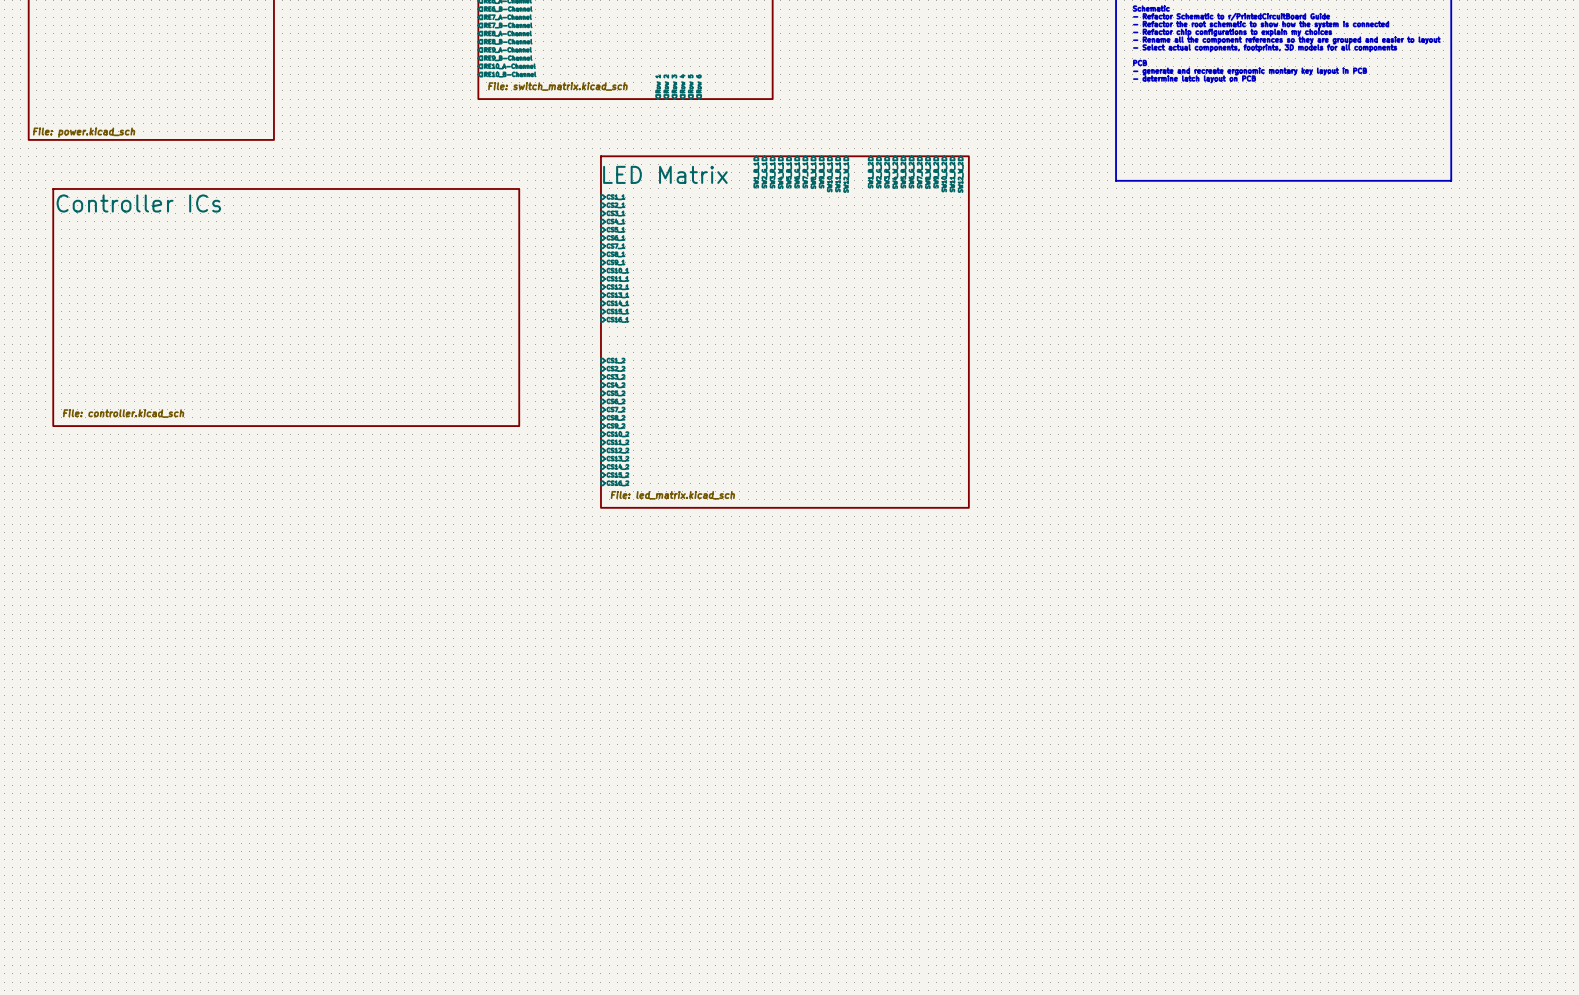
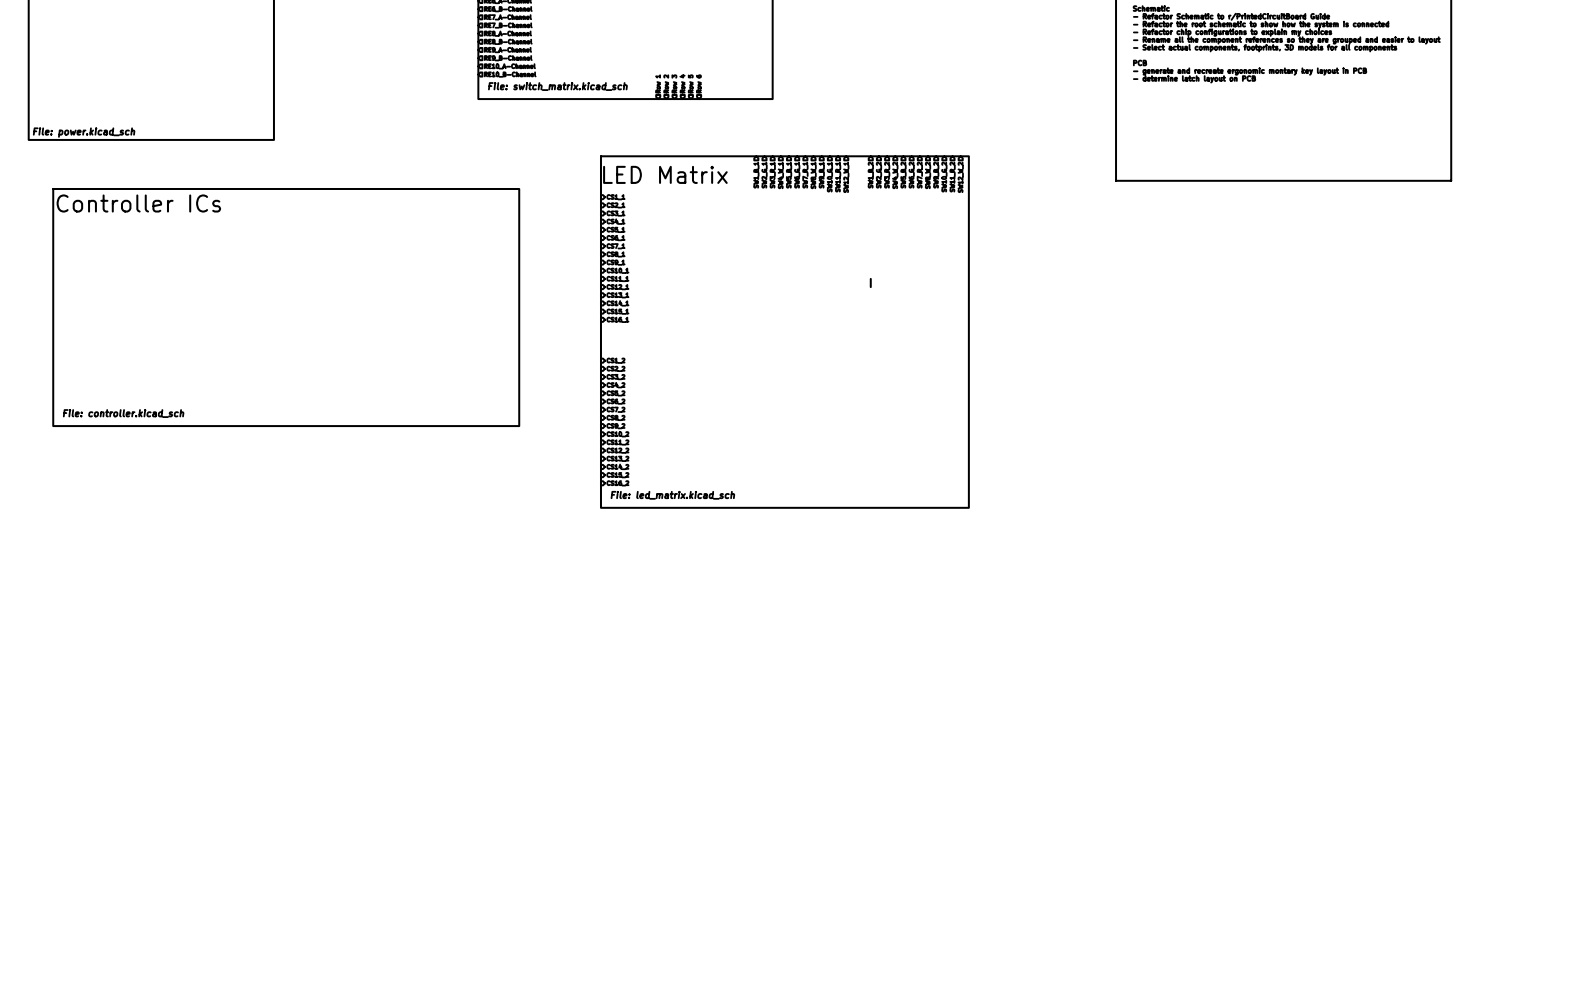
wire: none -> (870, 278) (870, 287)

